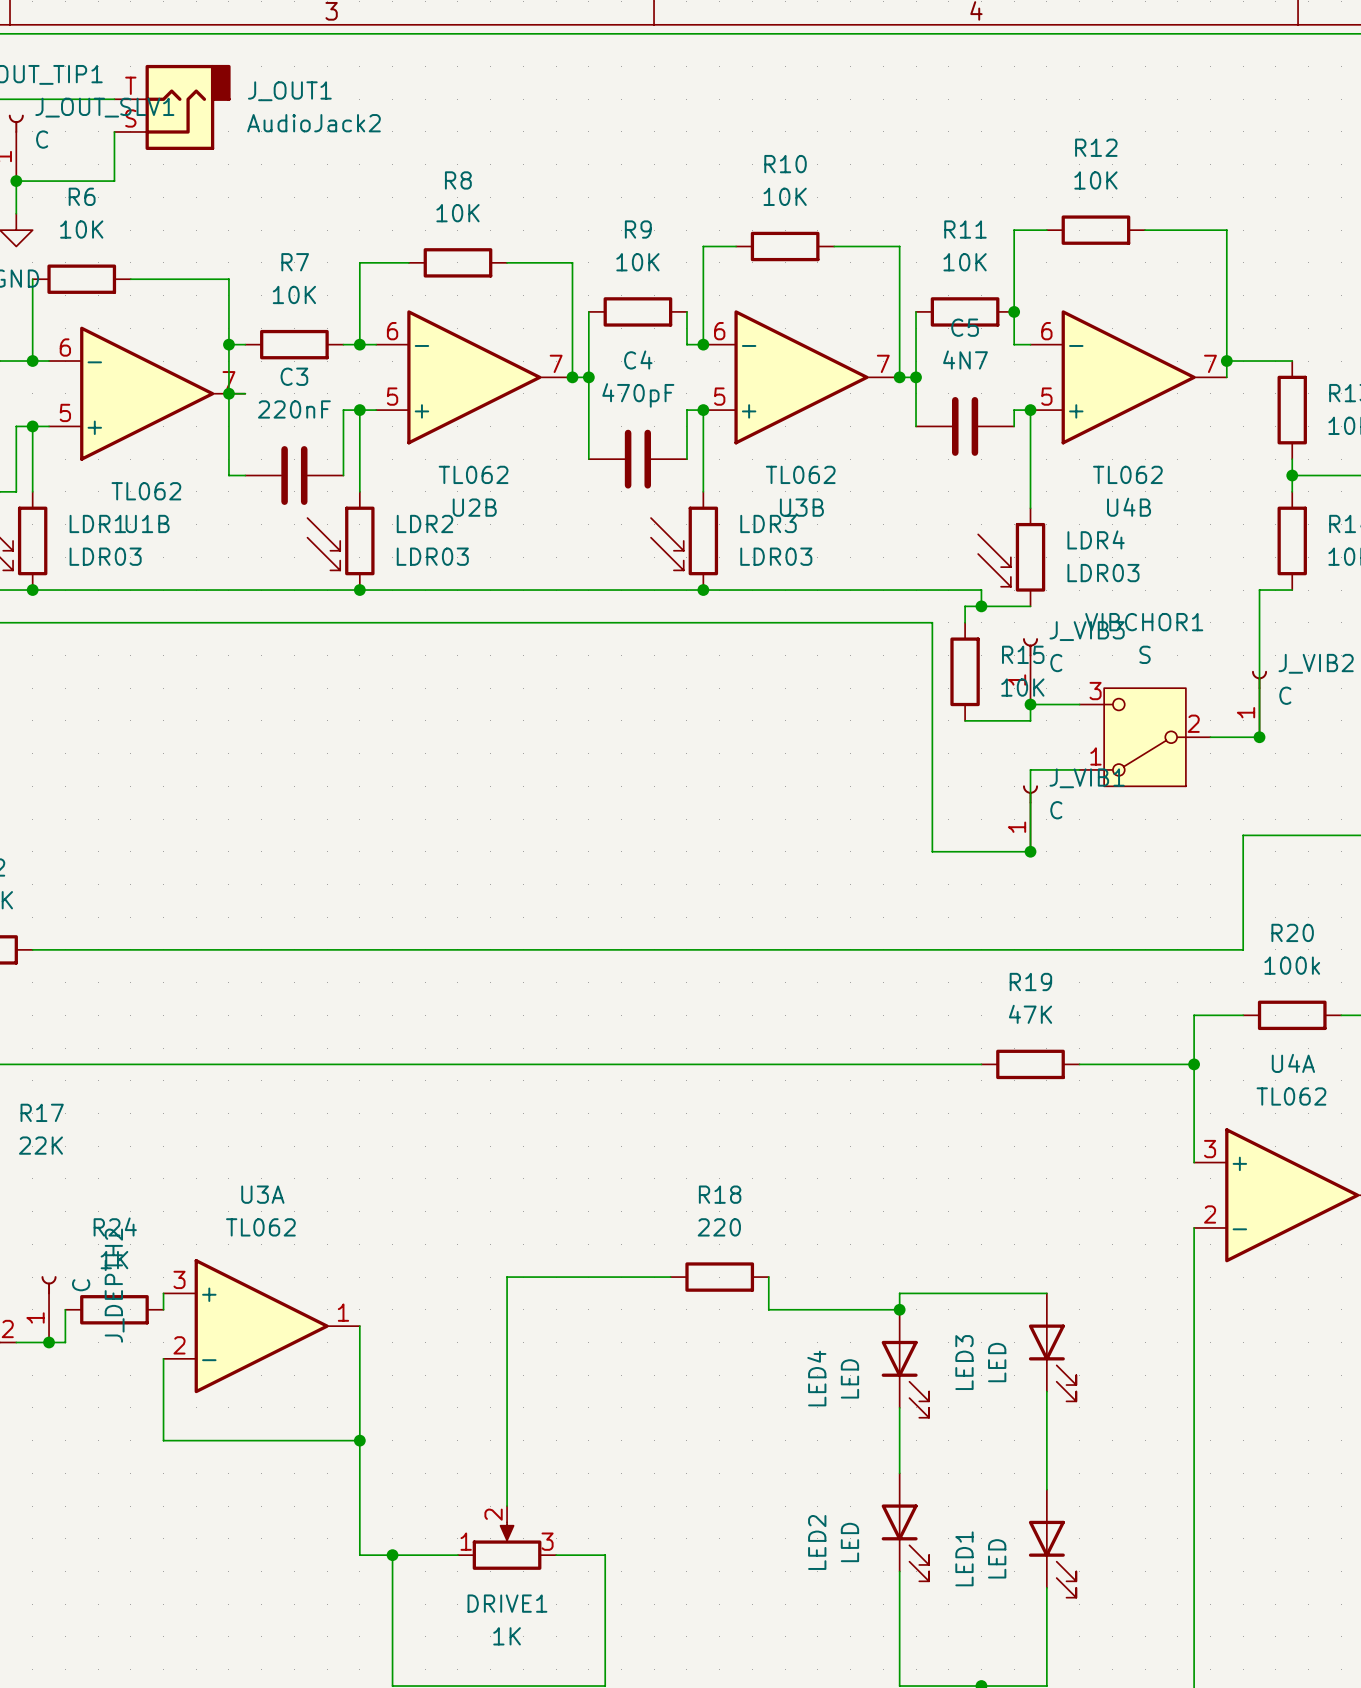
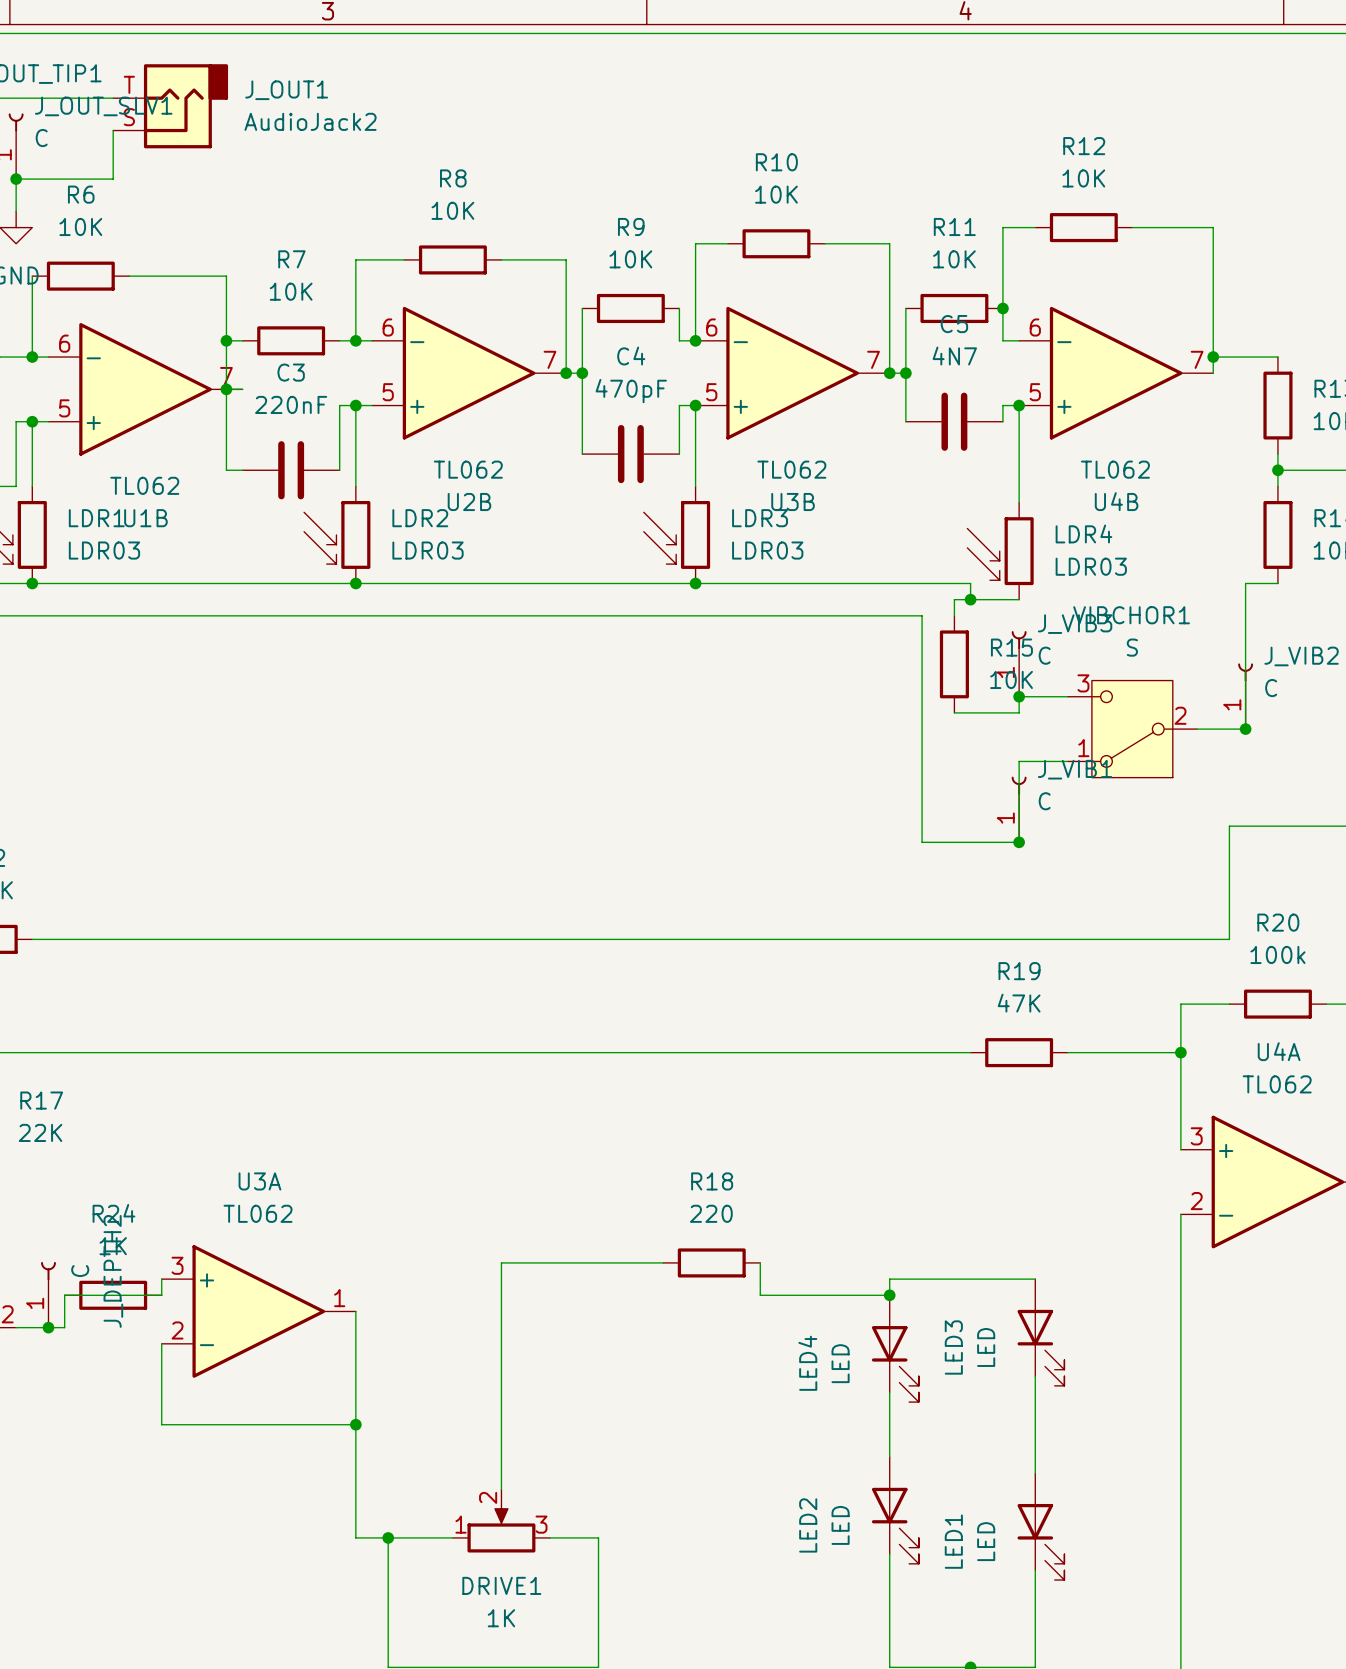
wire: none -> (64, 1295) (161, 1295)

